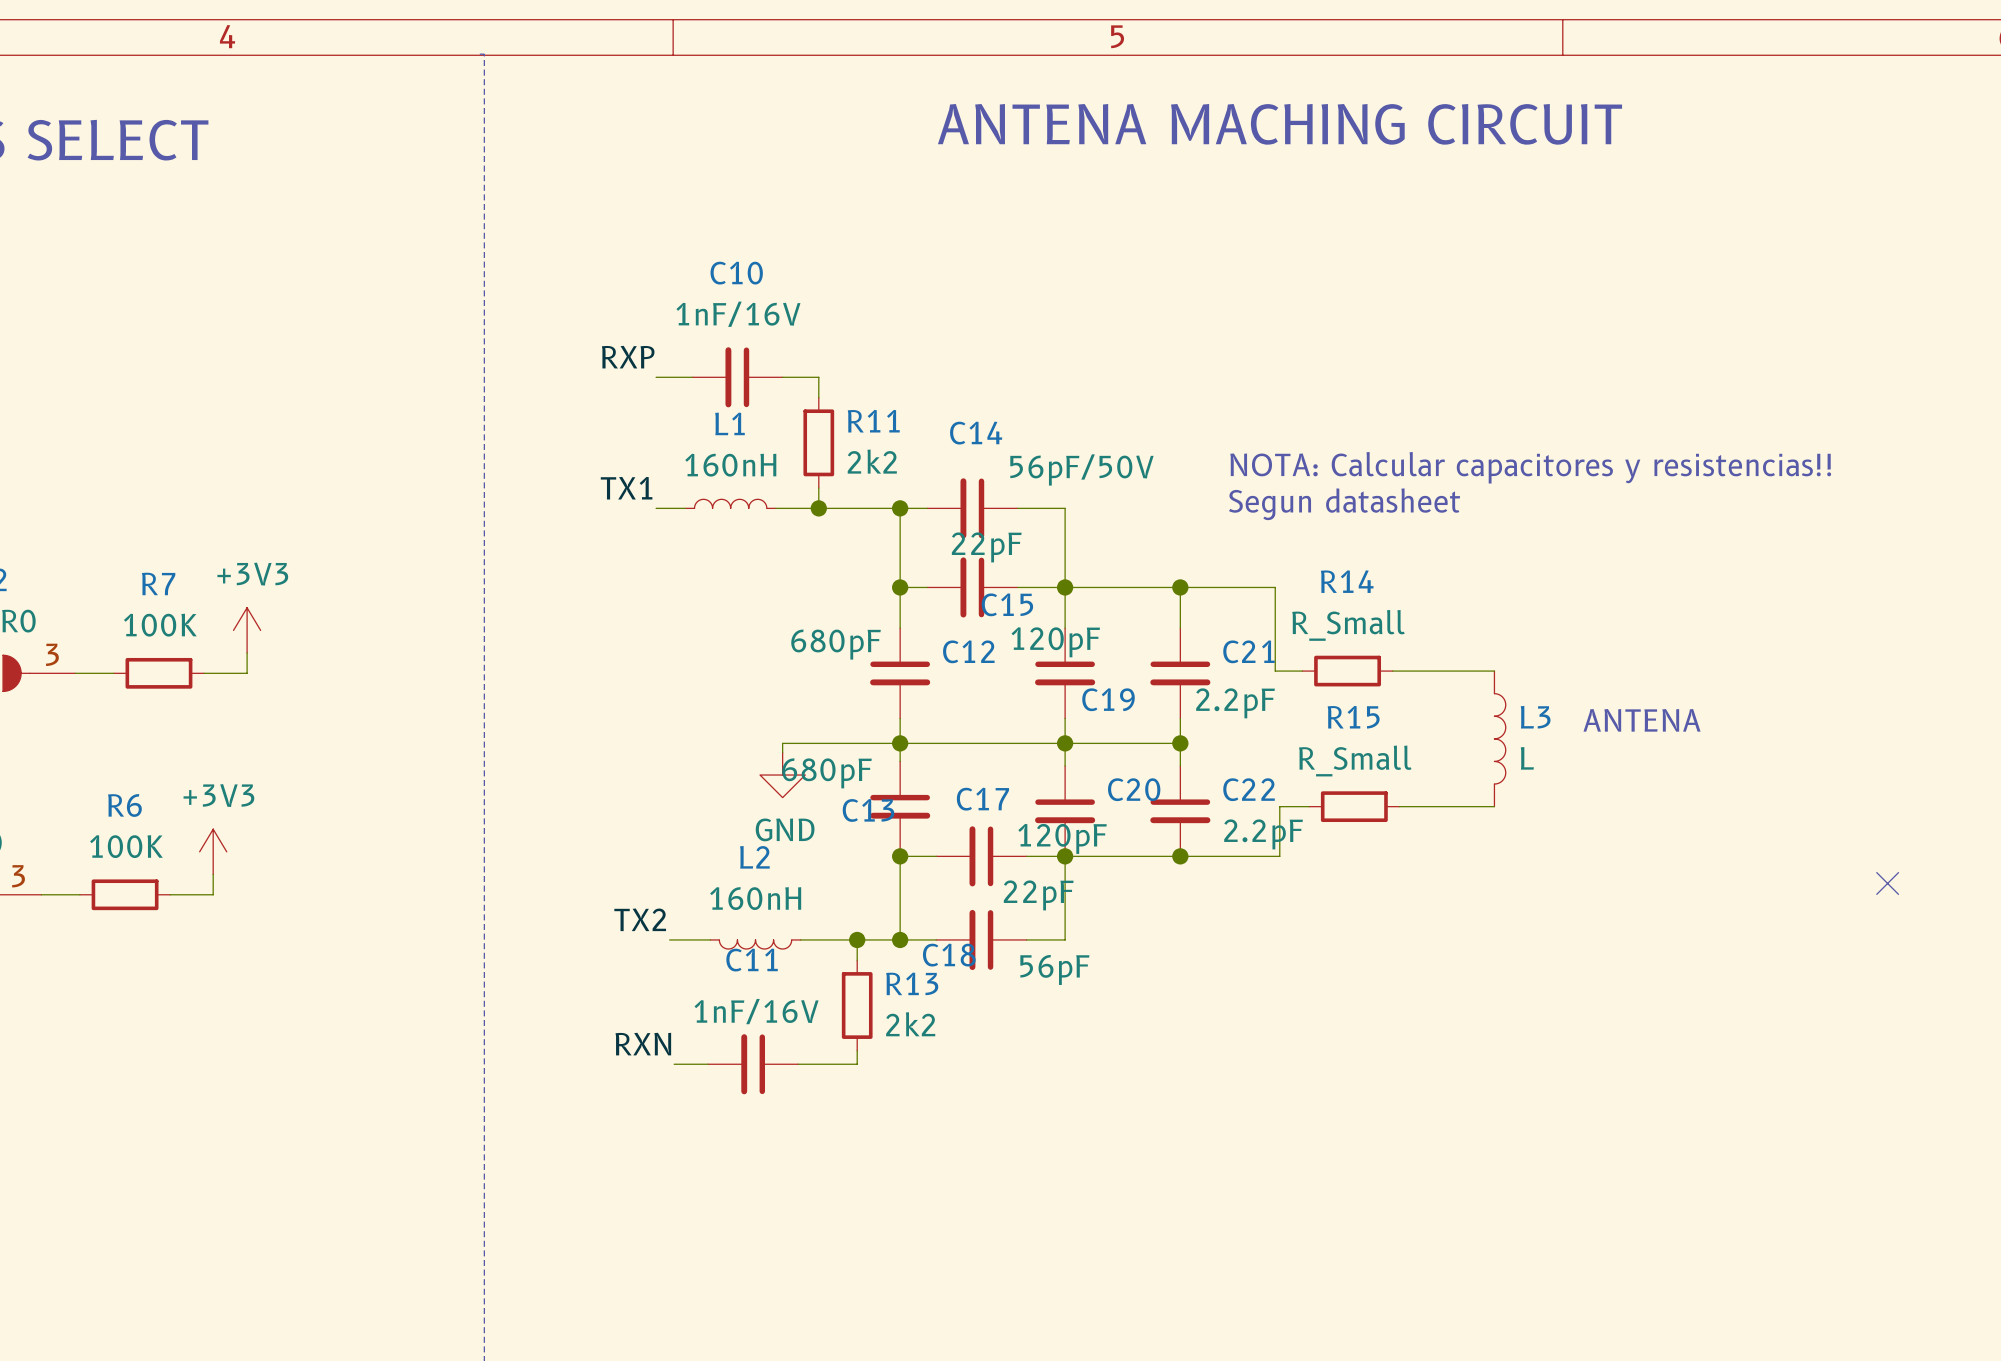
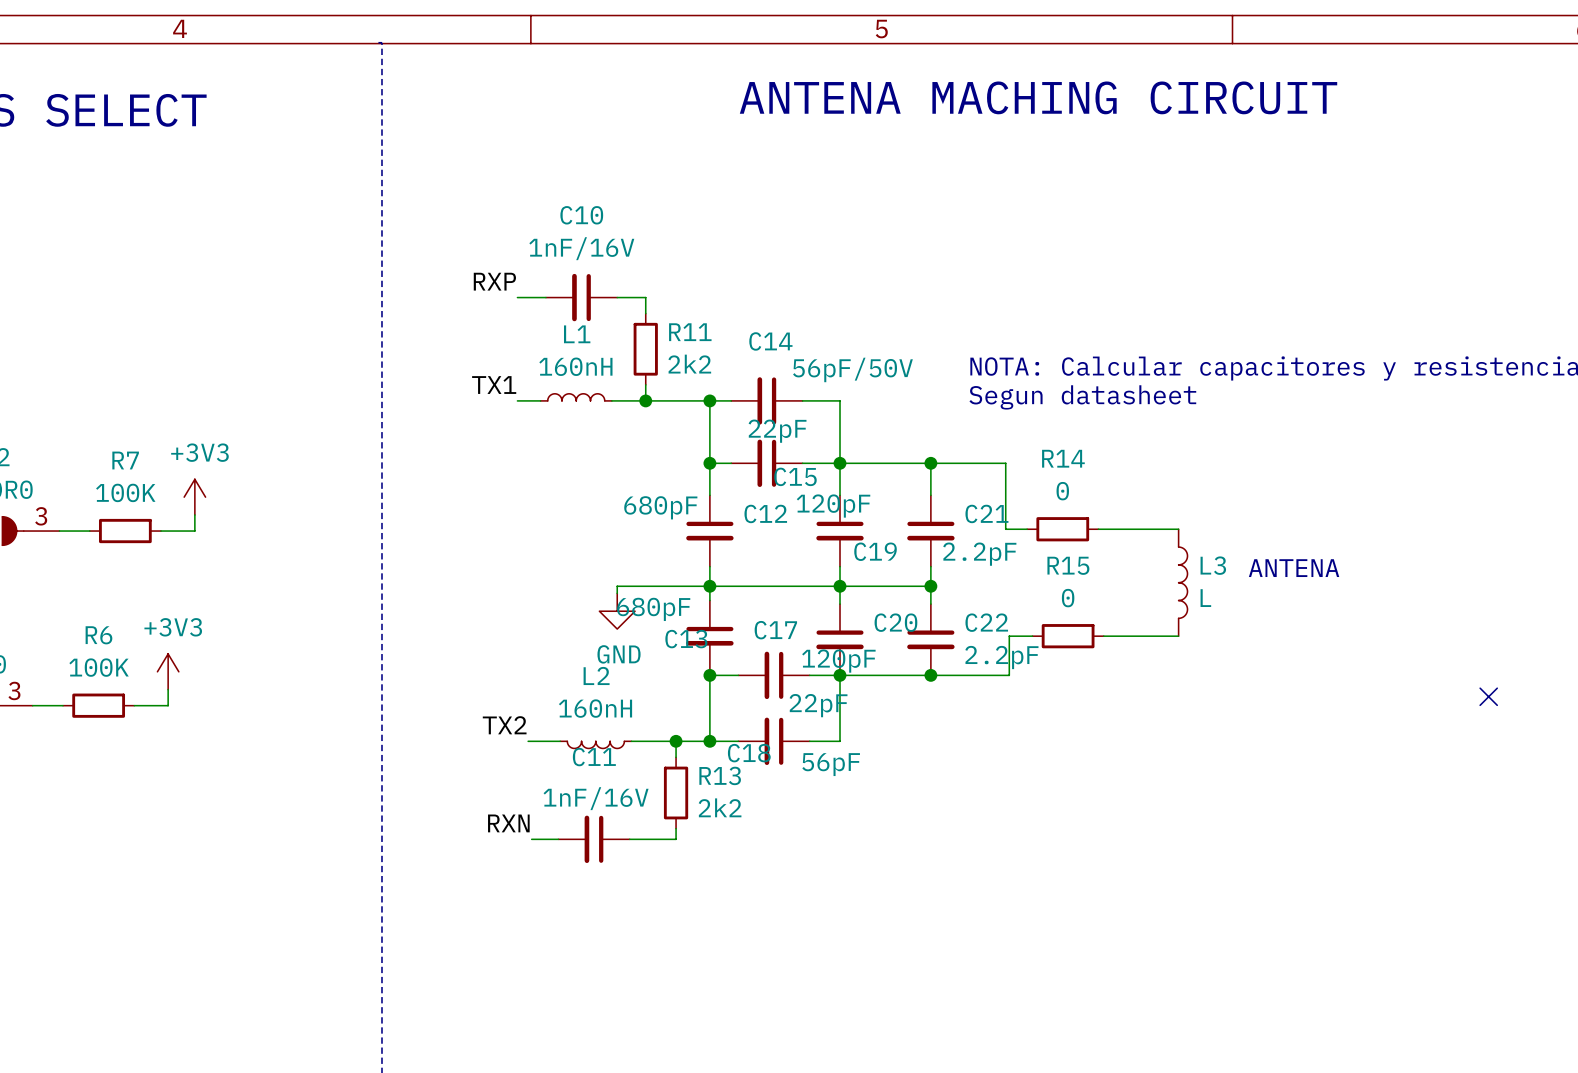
R14 value: R_Small (1348, 625) -> 0 (1062, 491)
R15 value: R_Small (1355, 760) -> 0 (1068, 598)

